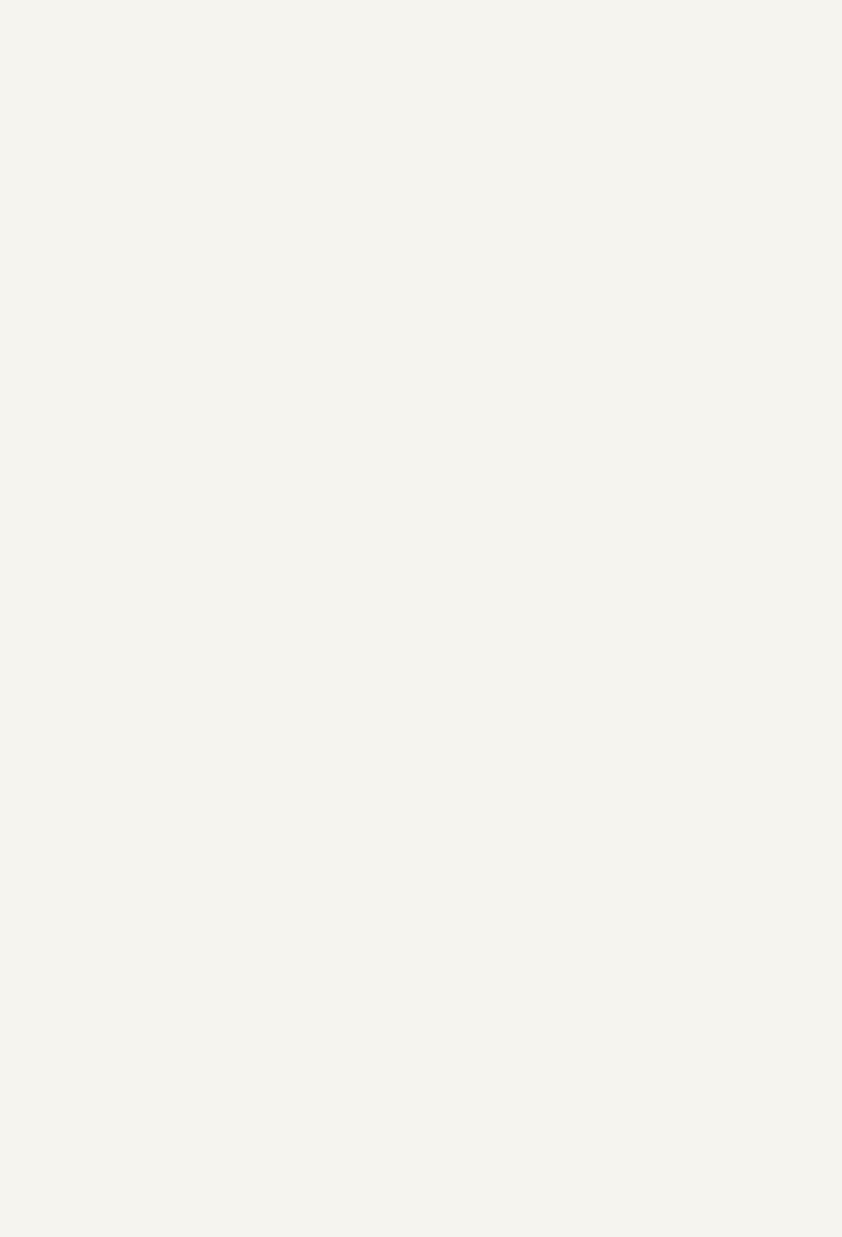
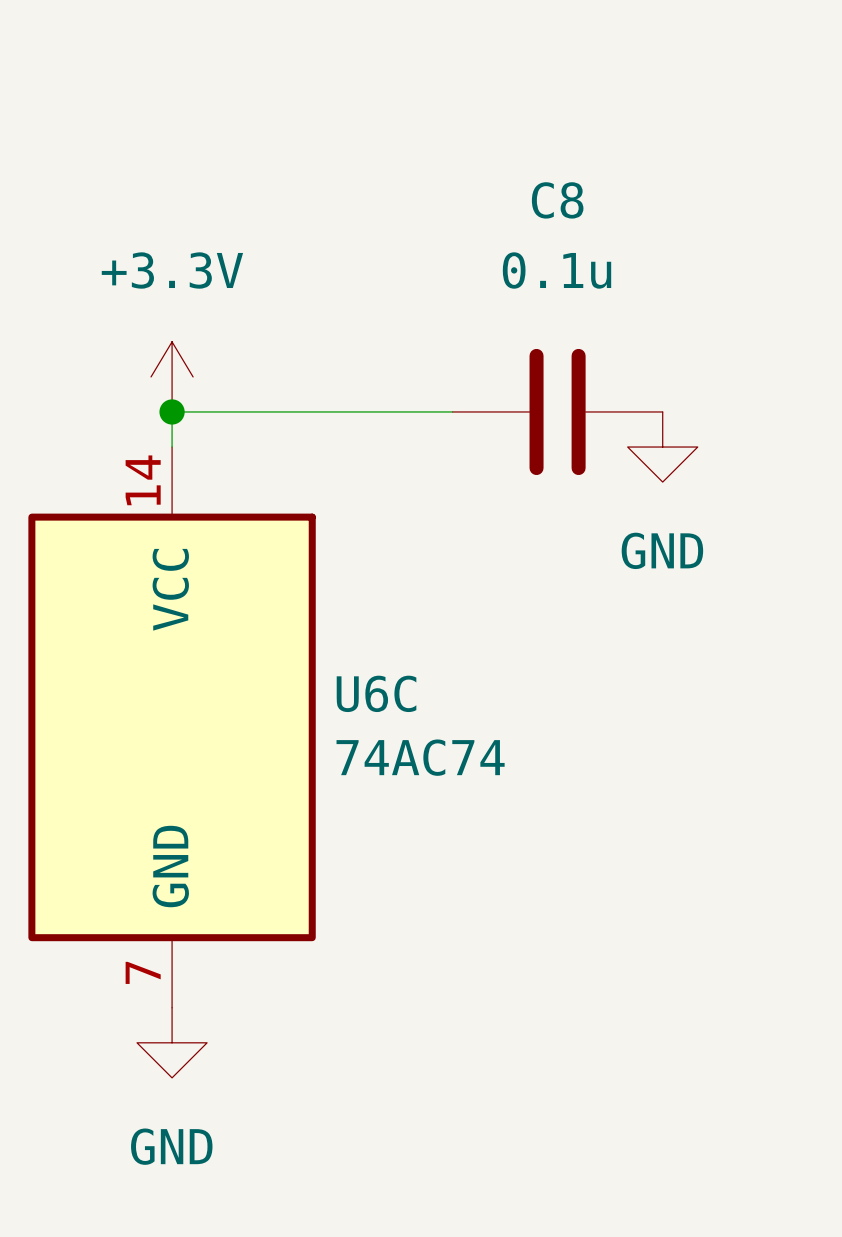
power symbol: none -> +3.3V (172, 376)
junction: none -> (172, 411)
wire: none -> (452, 411) (172, 411) (172, 447)
C8: none -> 0.1u (557, 411)
power symbol: none -> GND (662, 447)
U6C: none -> 74AC74 (172, 727)
power symbol: none -> GND (172, 1042)

